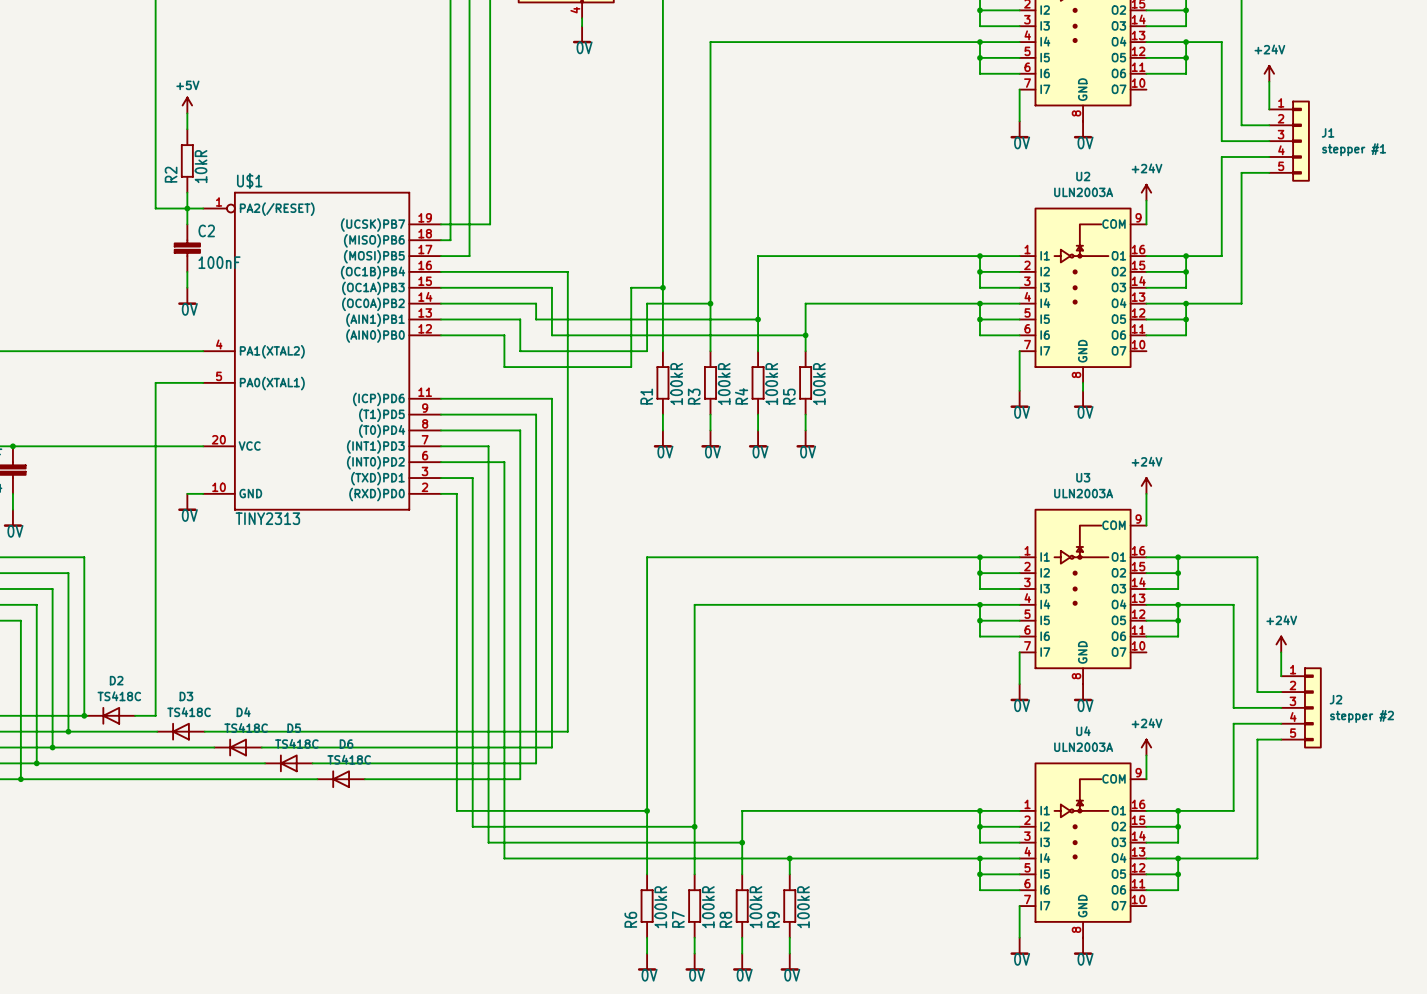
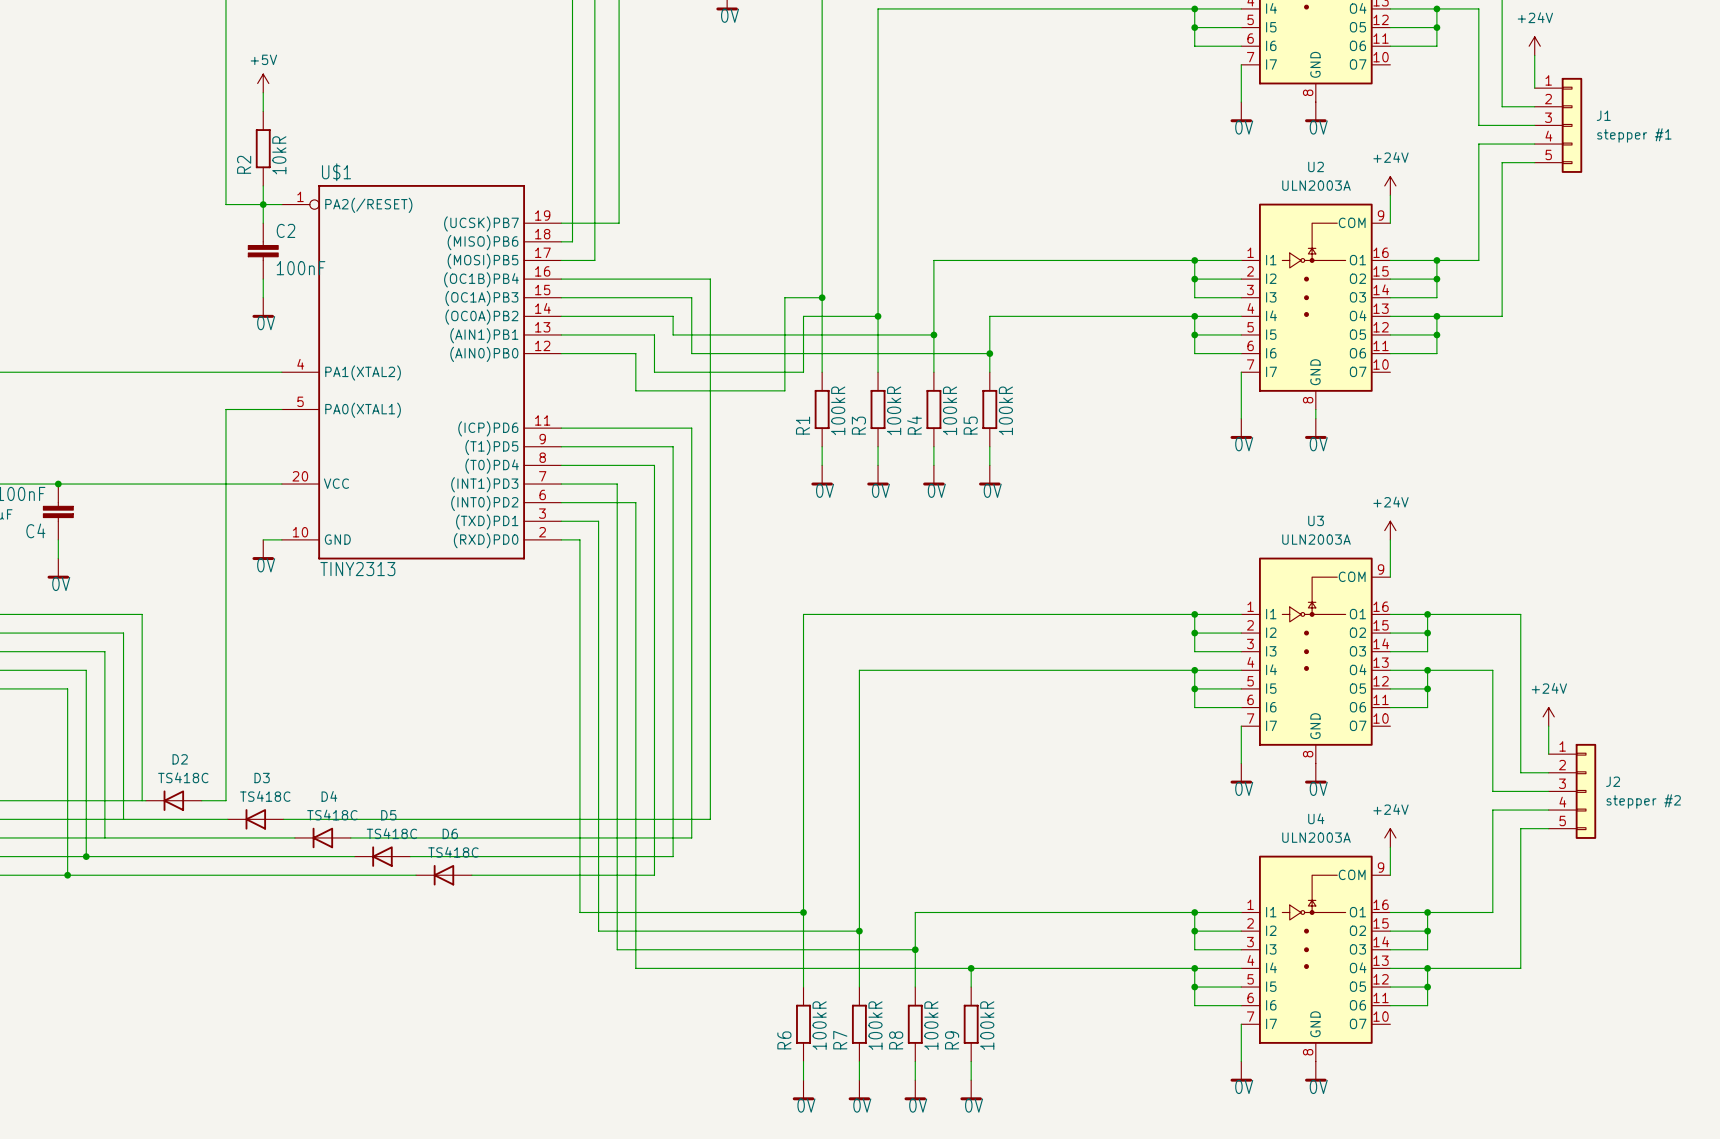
junction: (84, 715) -> none
junction: (68, 731) -> none
junction: (52, 747) -> none

